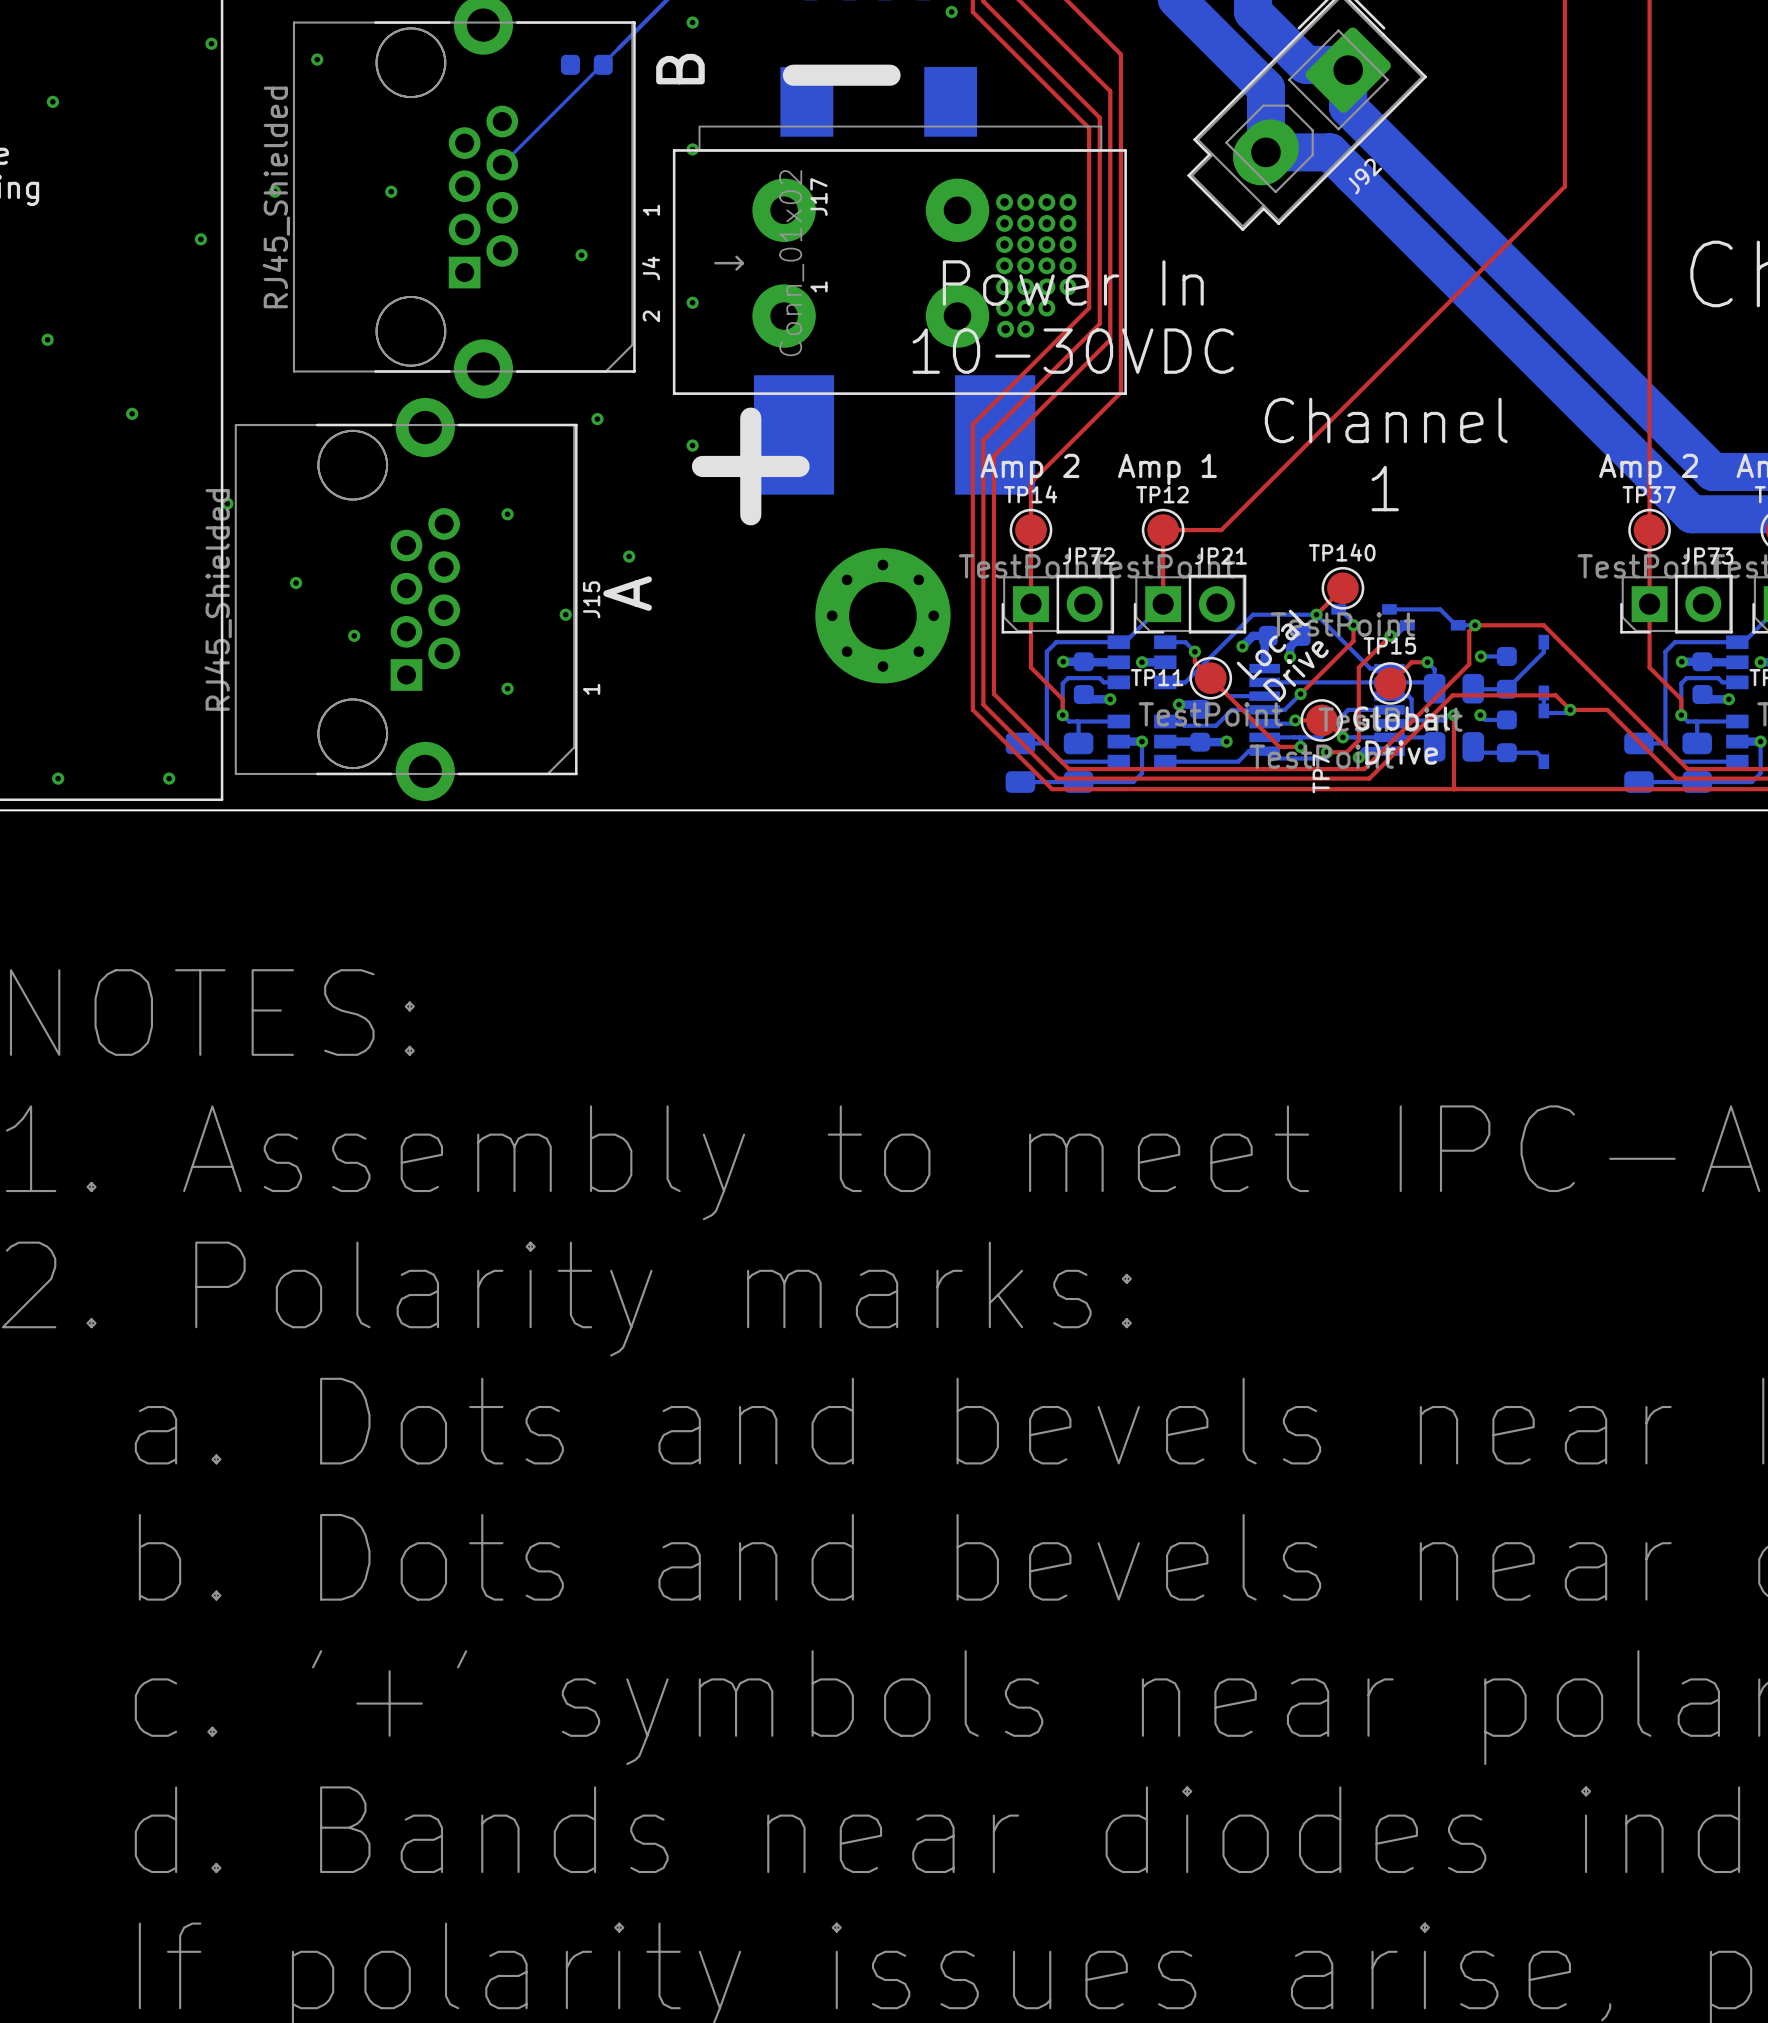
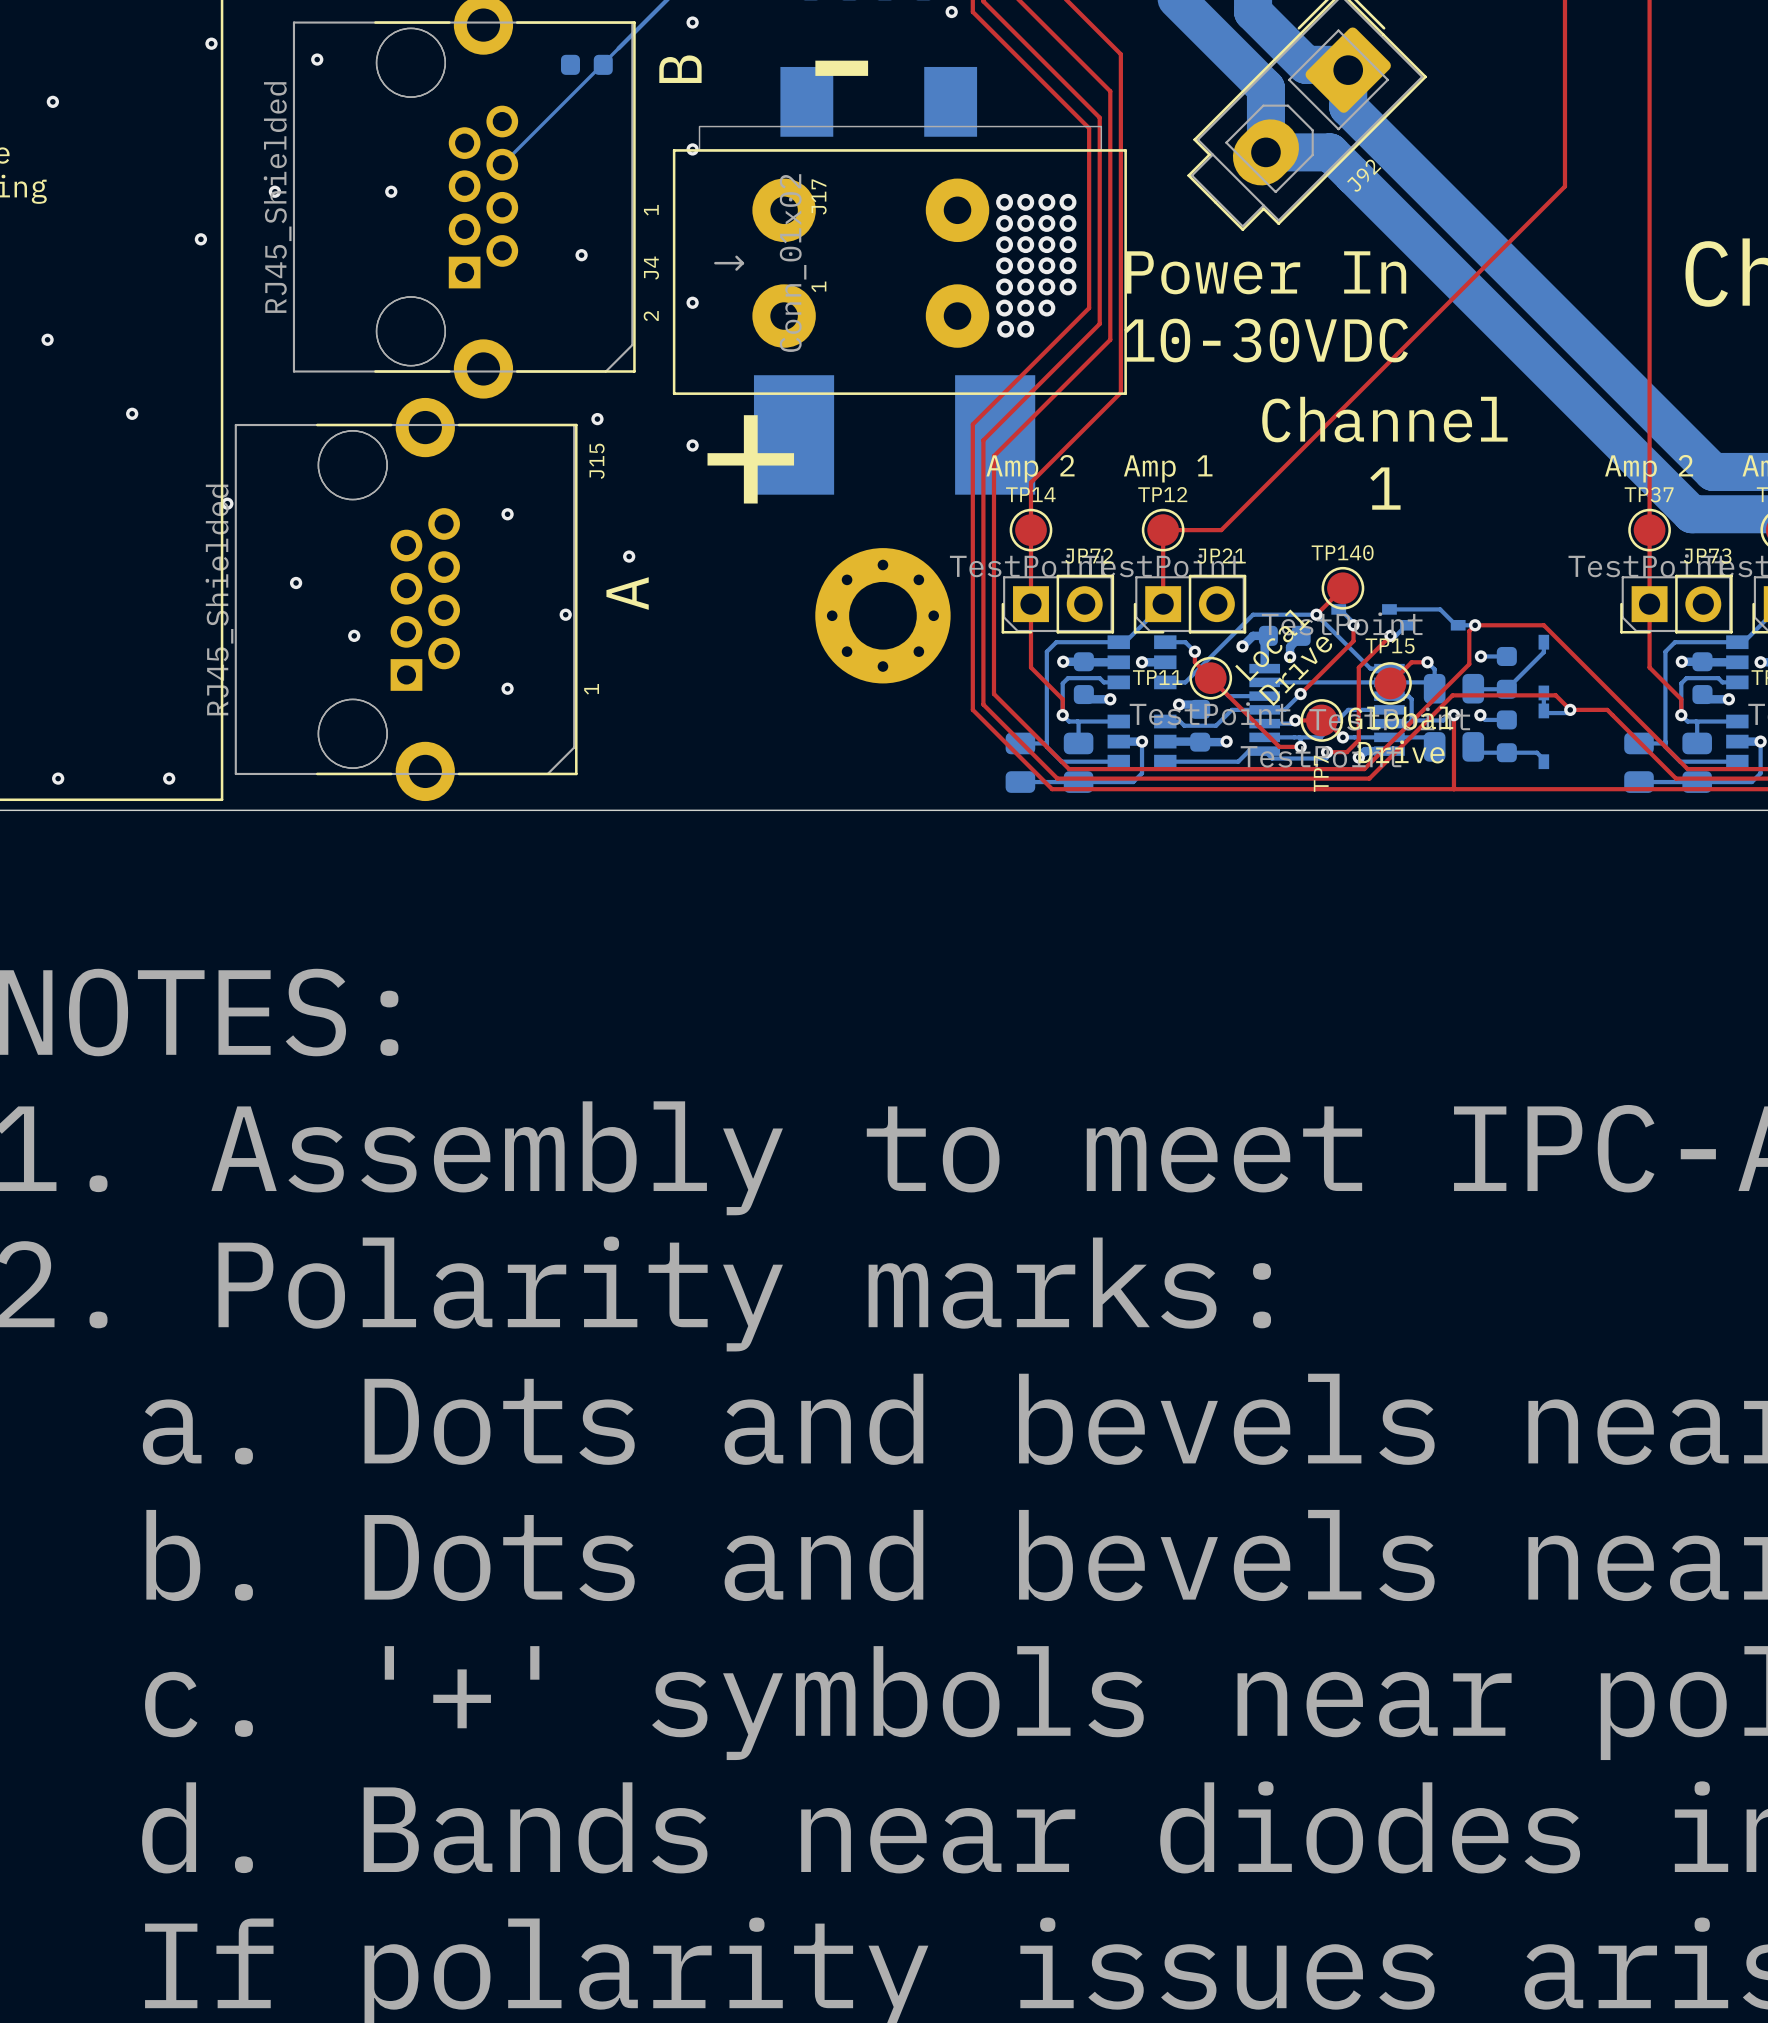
text position: Power In (1073, 283) -> Power In (1266, 272)
text position: 10-30VDC (1073, 351) -> 10-30VDC (1266, 340)
J15 name position: J15 (591, 599) -> J15 (597, 461)

